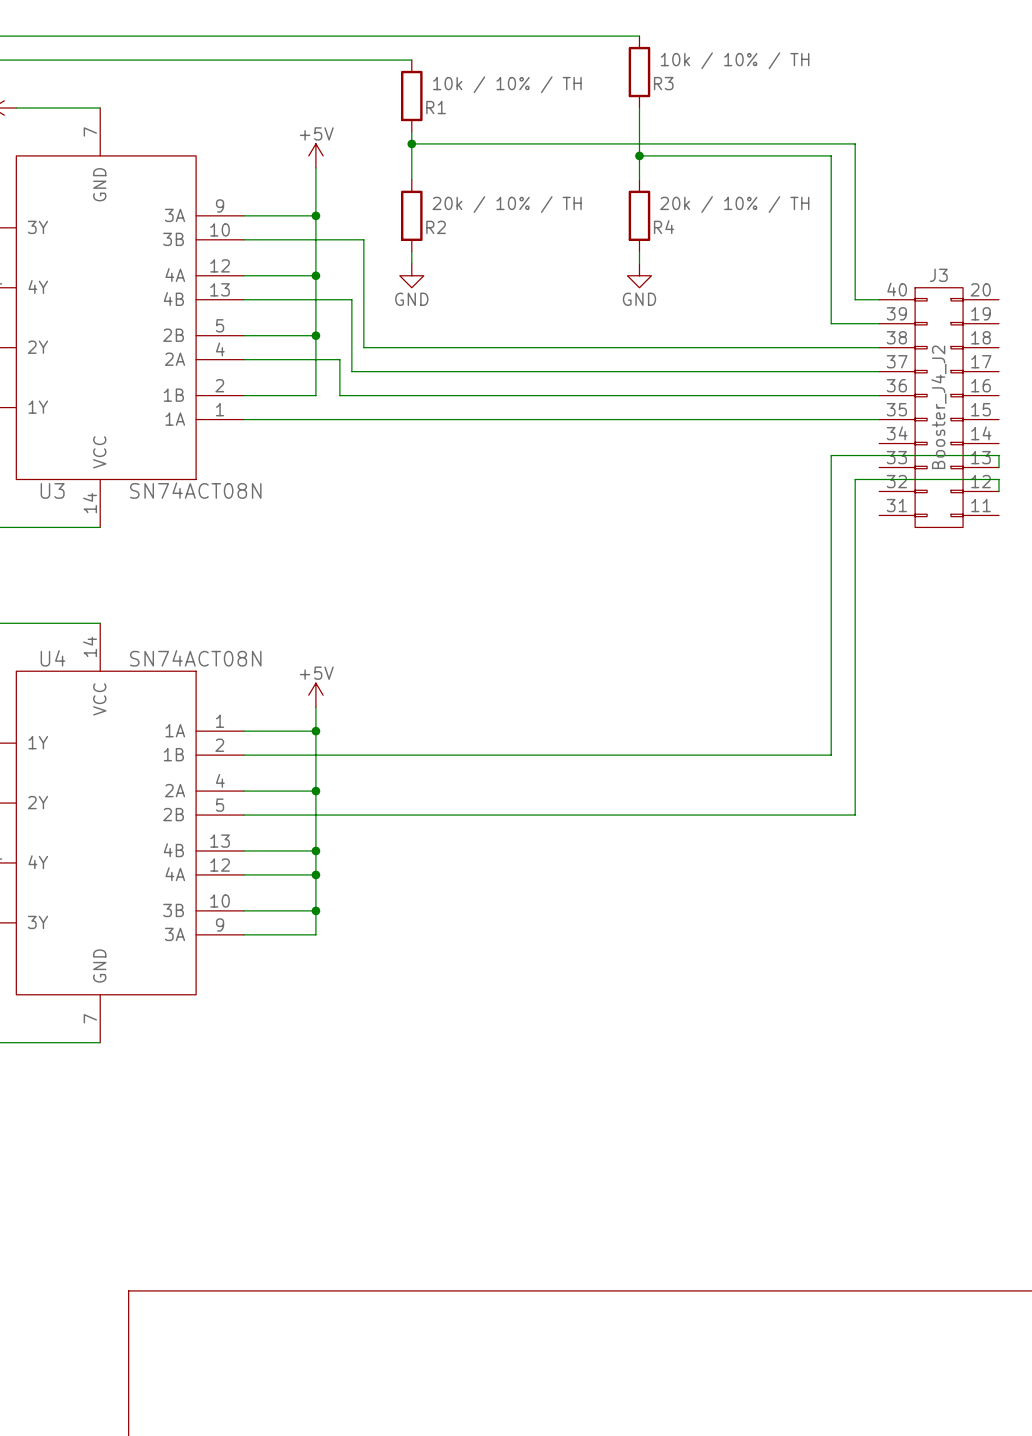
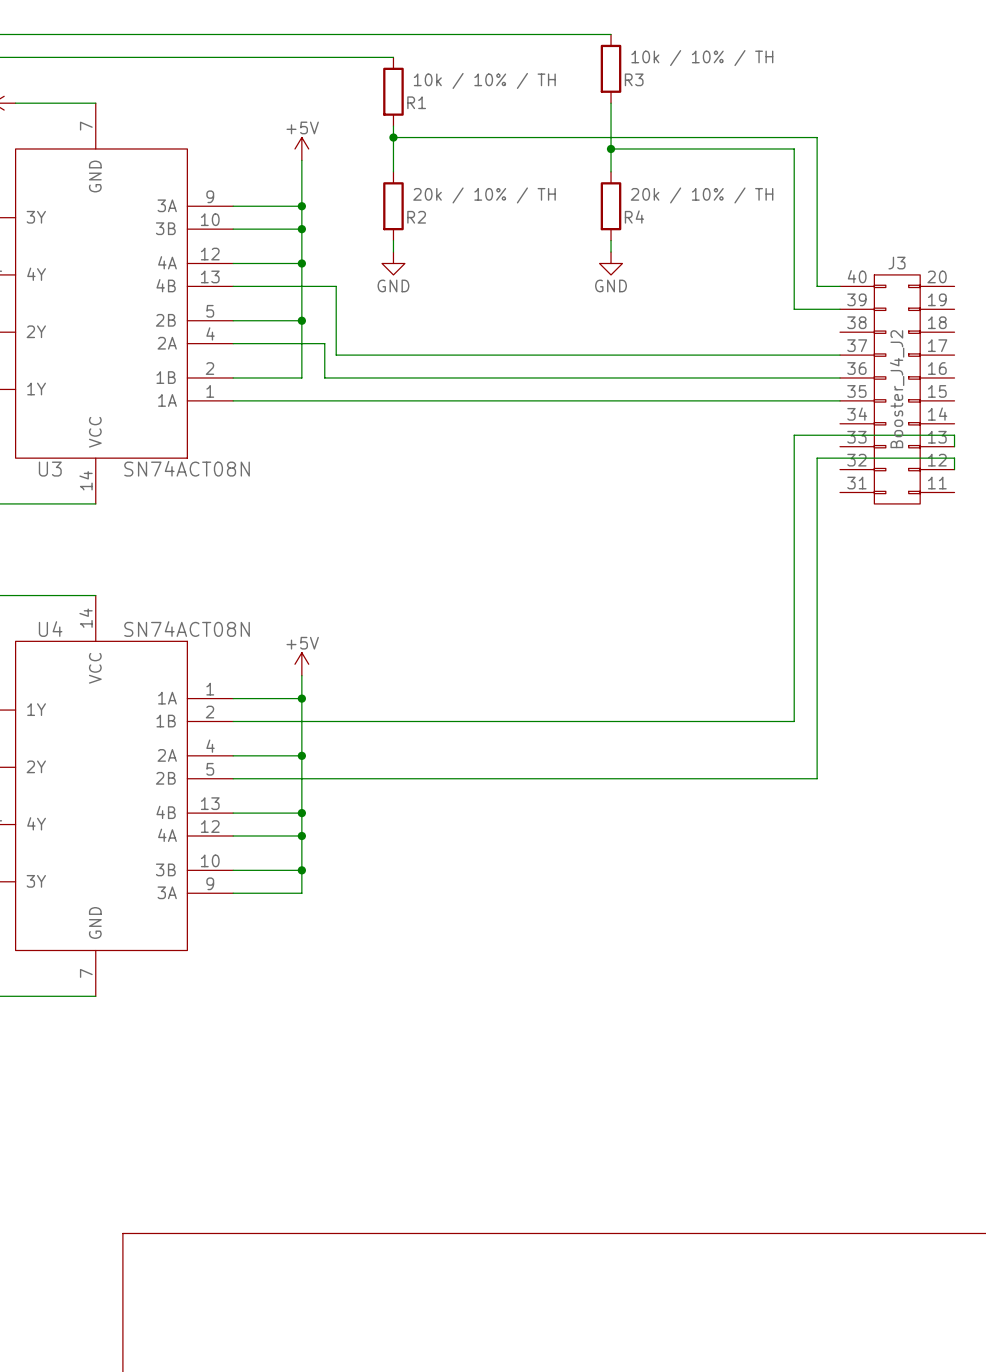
wire: (315, 239) (363, 239) (363, 347) (879, 347) -> none
junction: none -> (301, 229)

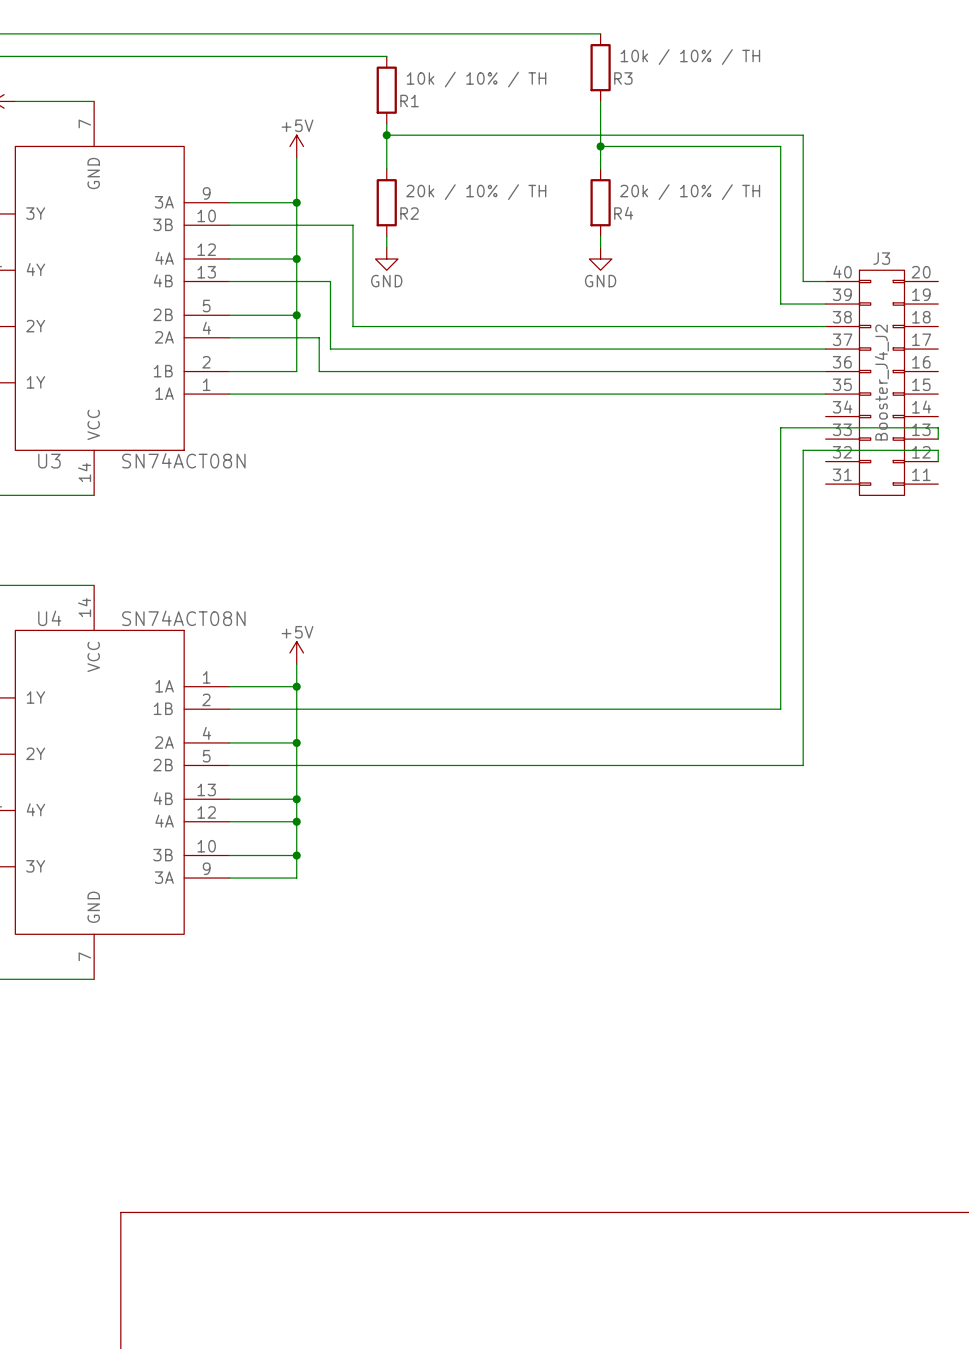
wire: none -> (296, 225) (352, 225) (352, 326) (825, 326)
junction: (301, 229) -> none

